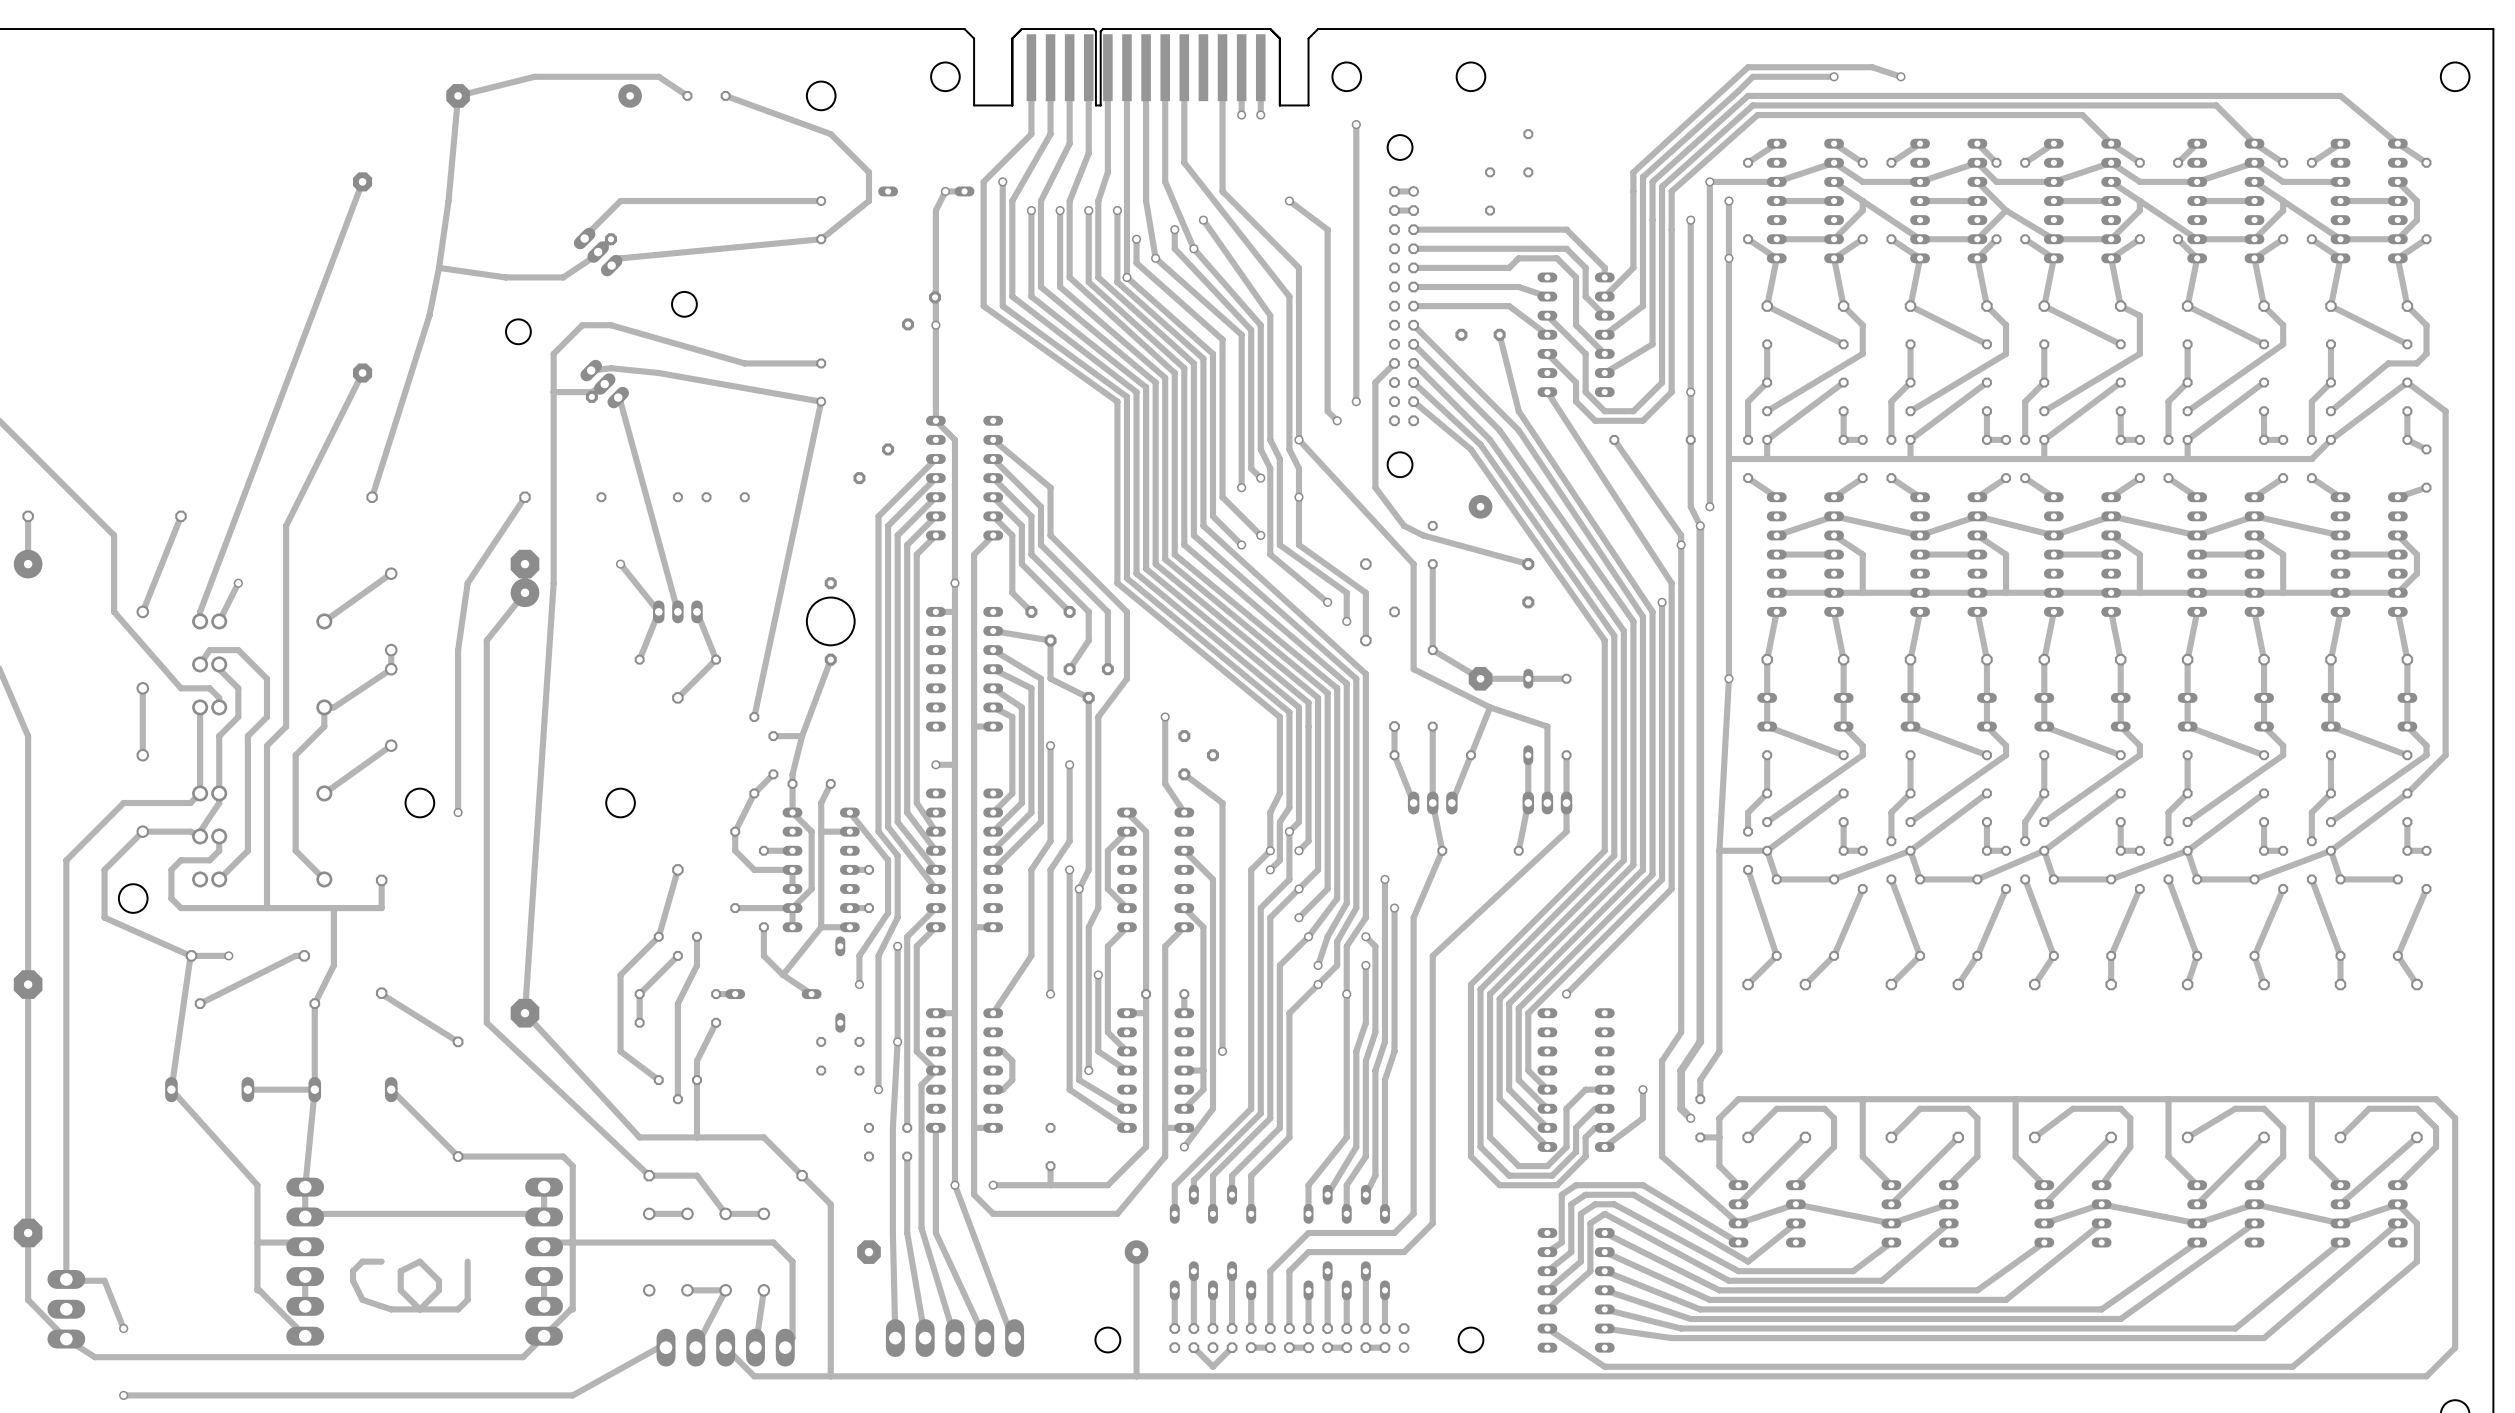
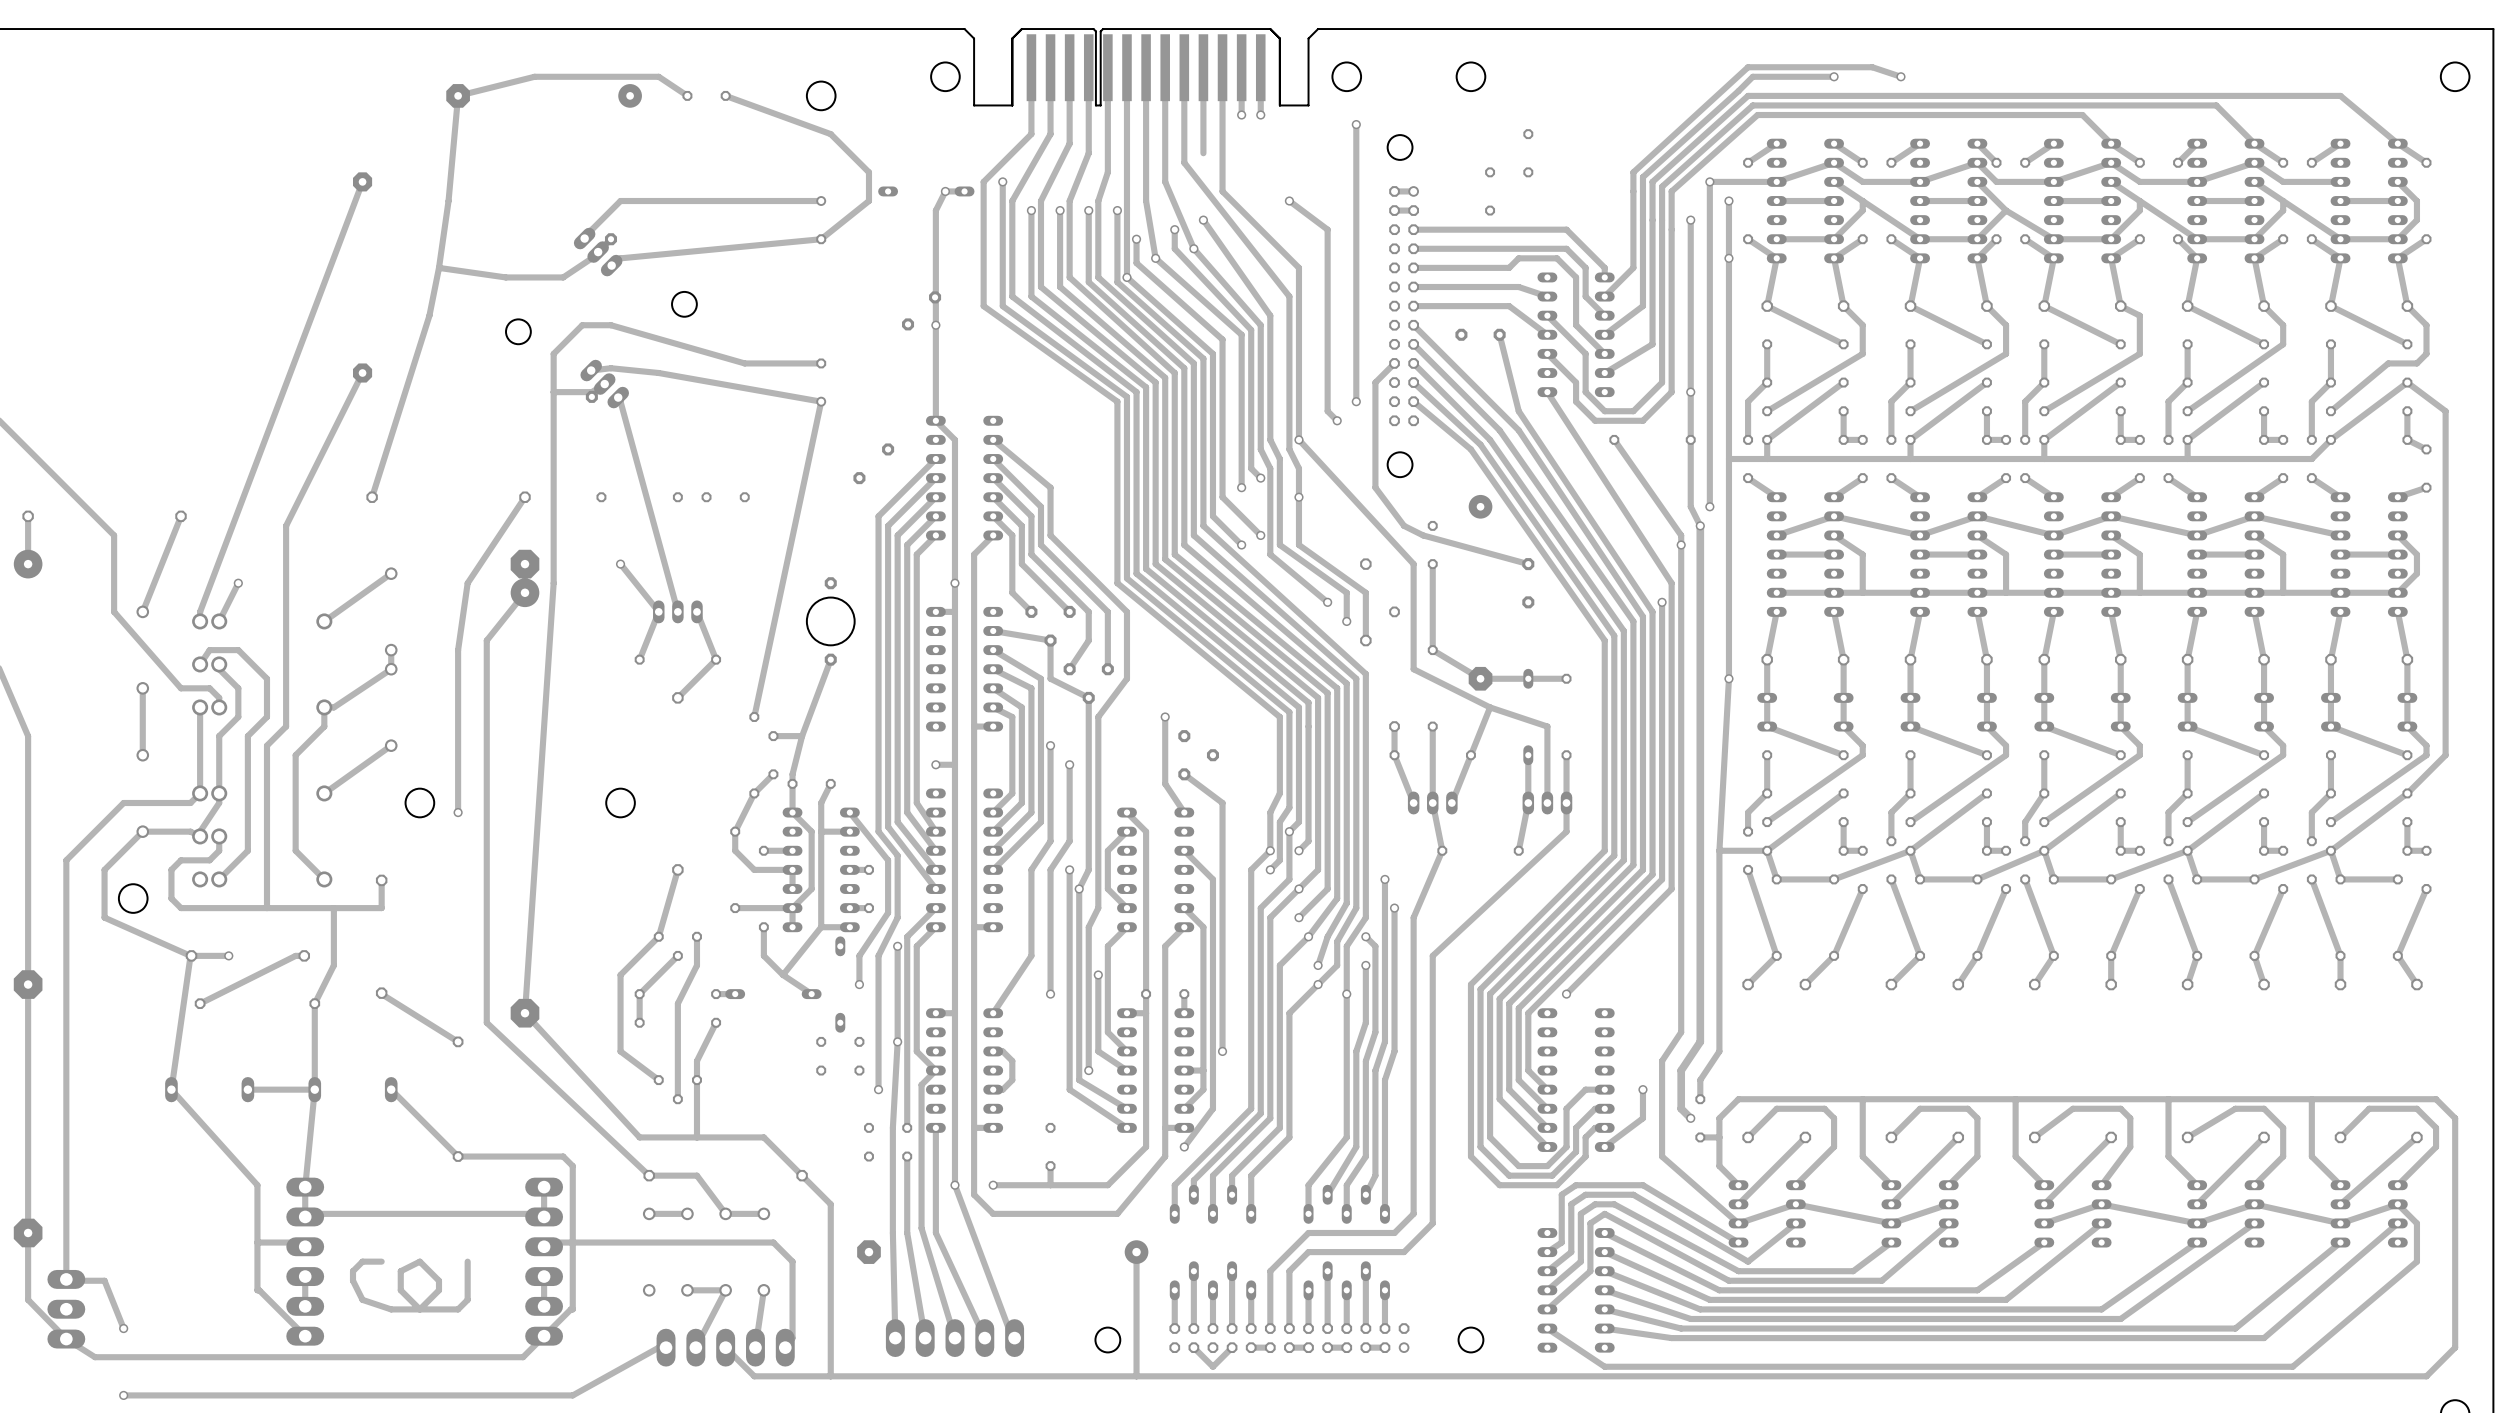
track: none -> (1203, 67) (1203, 153)

